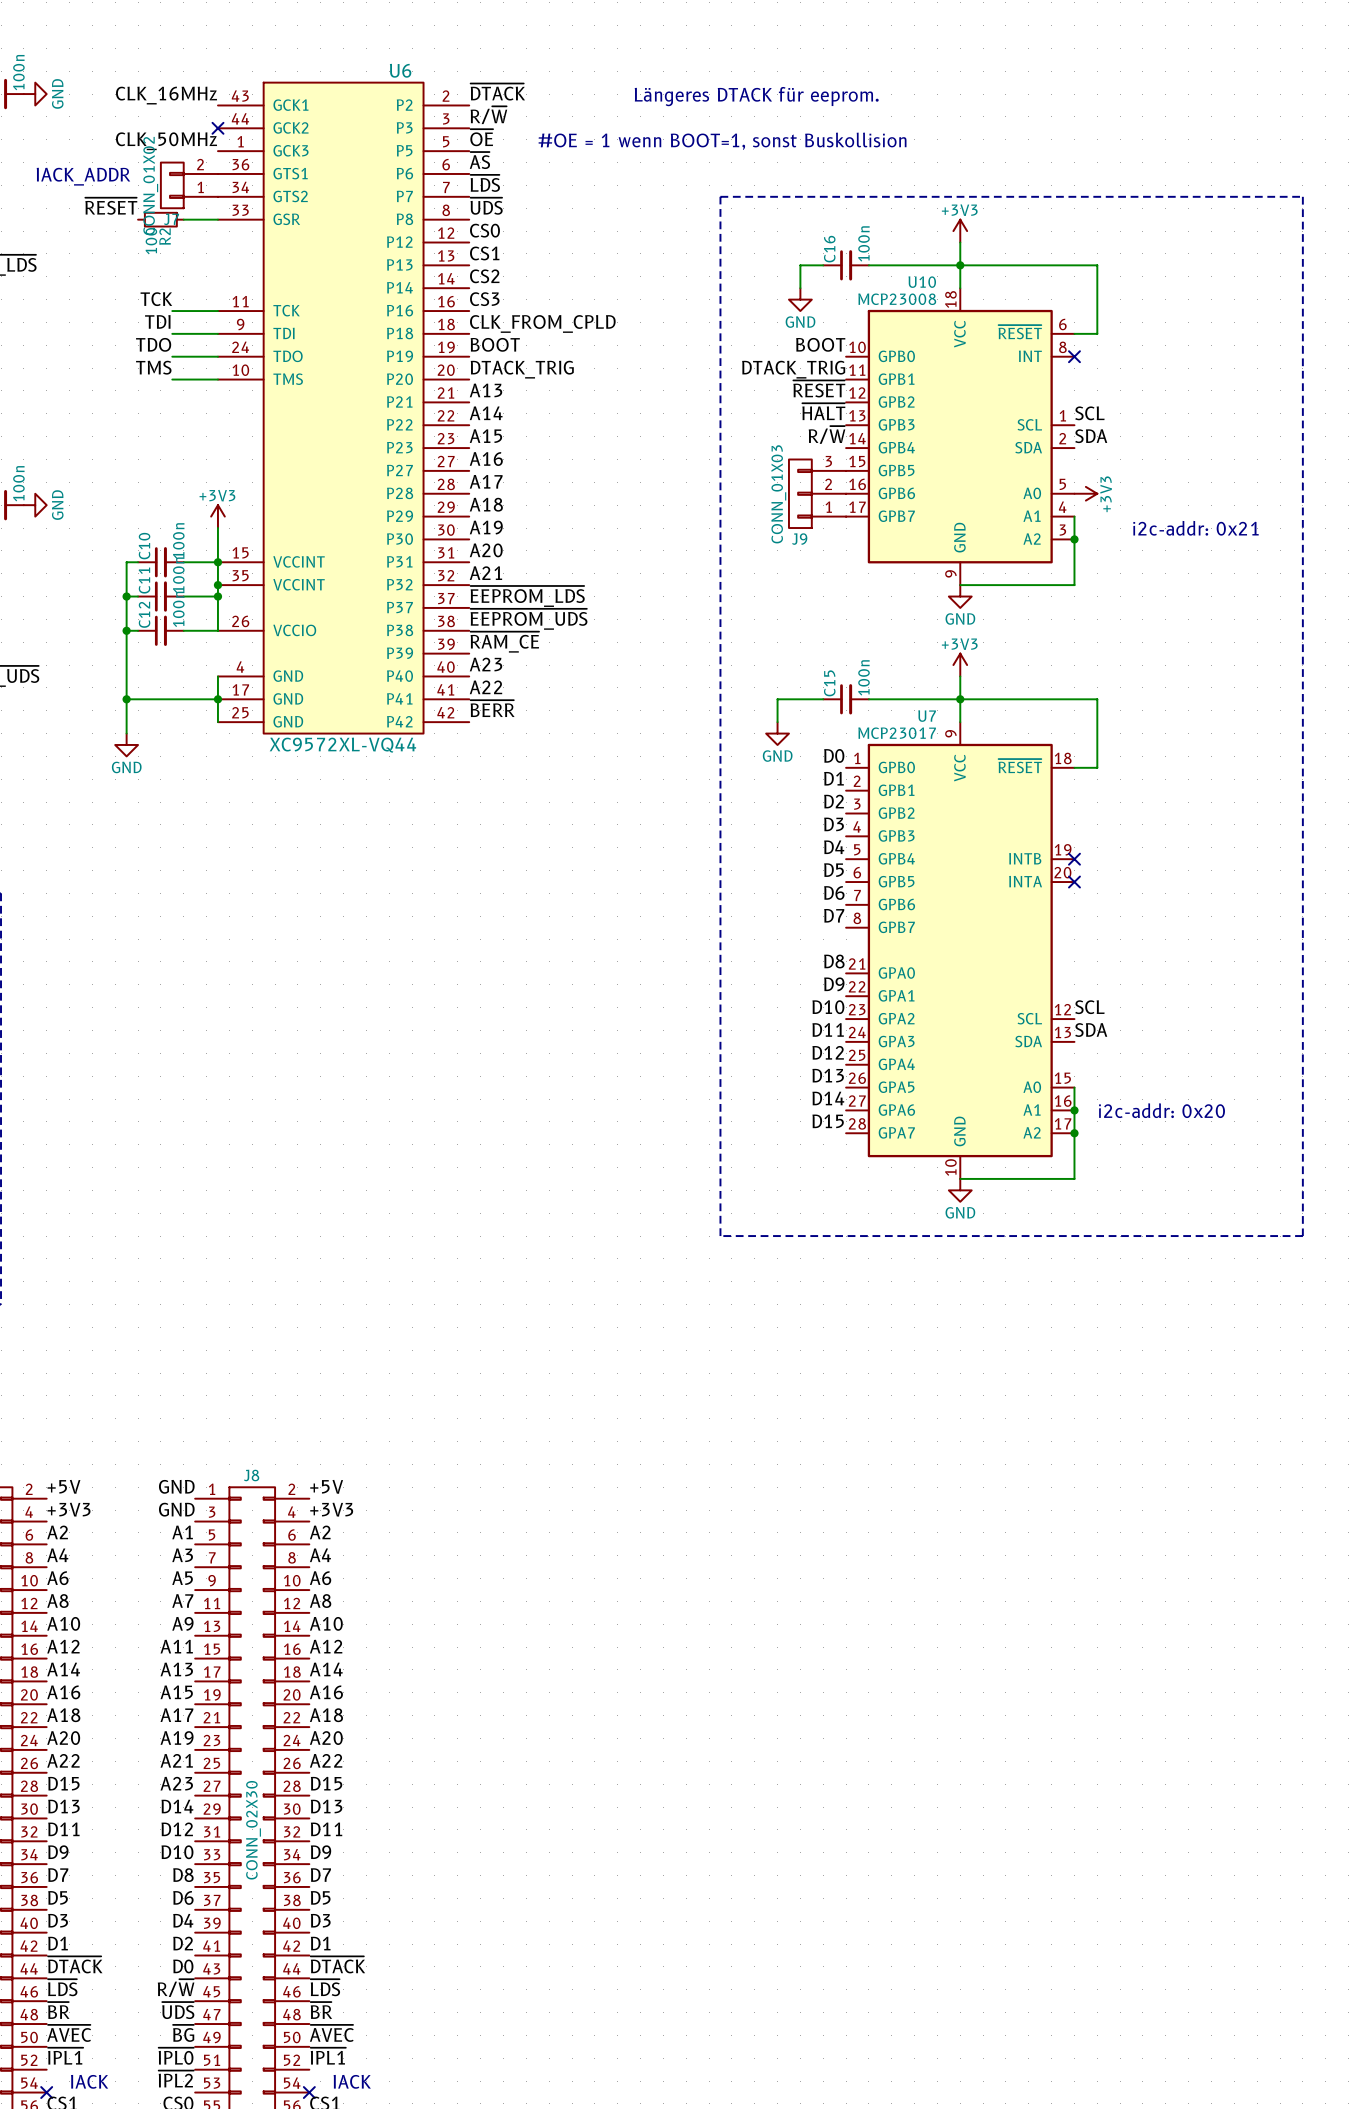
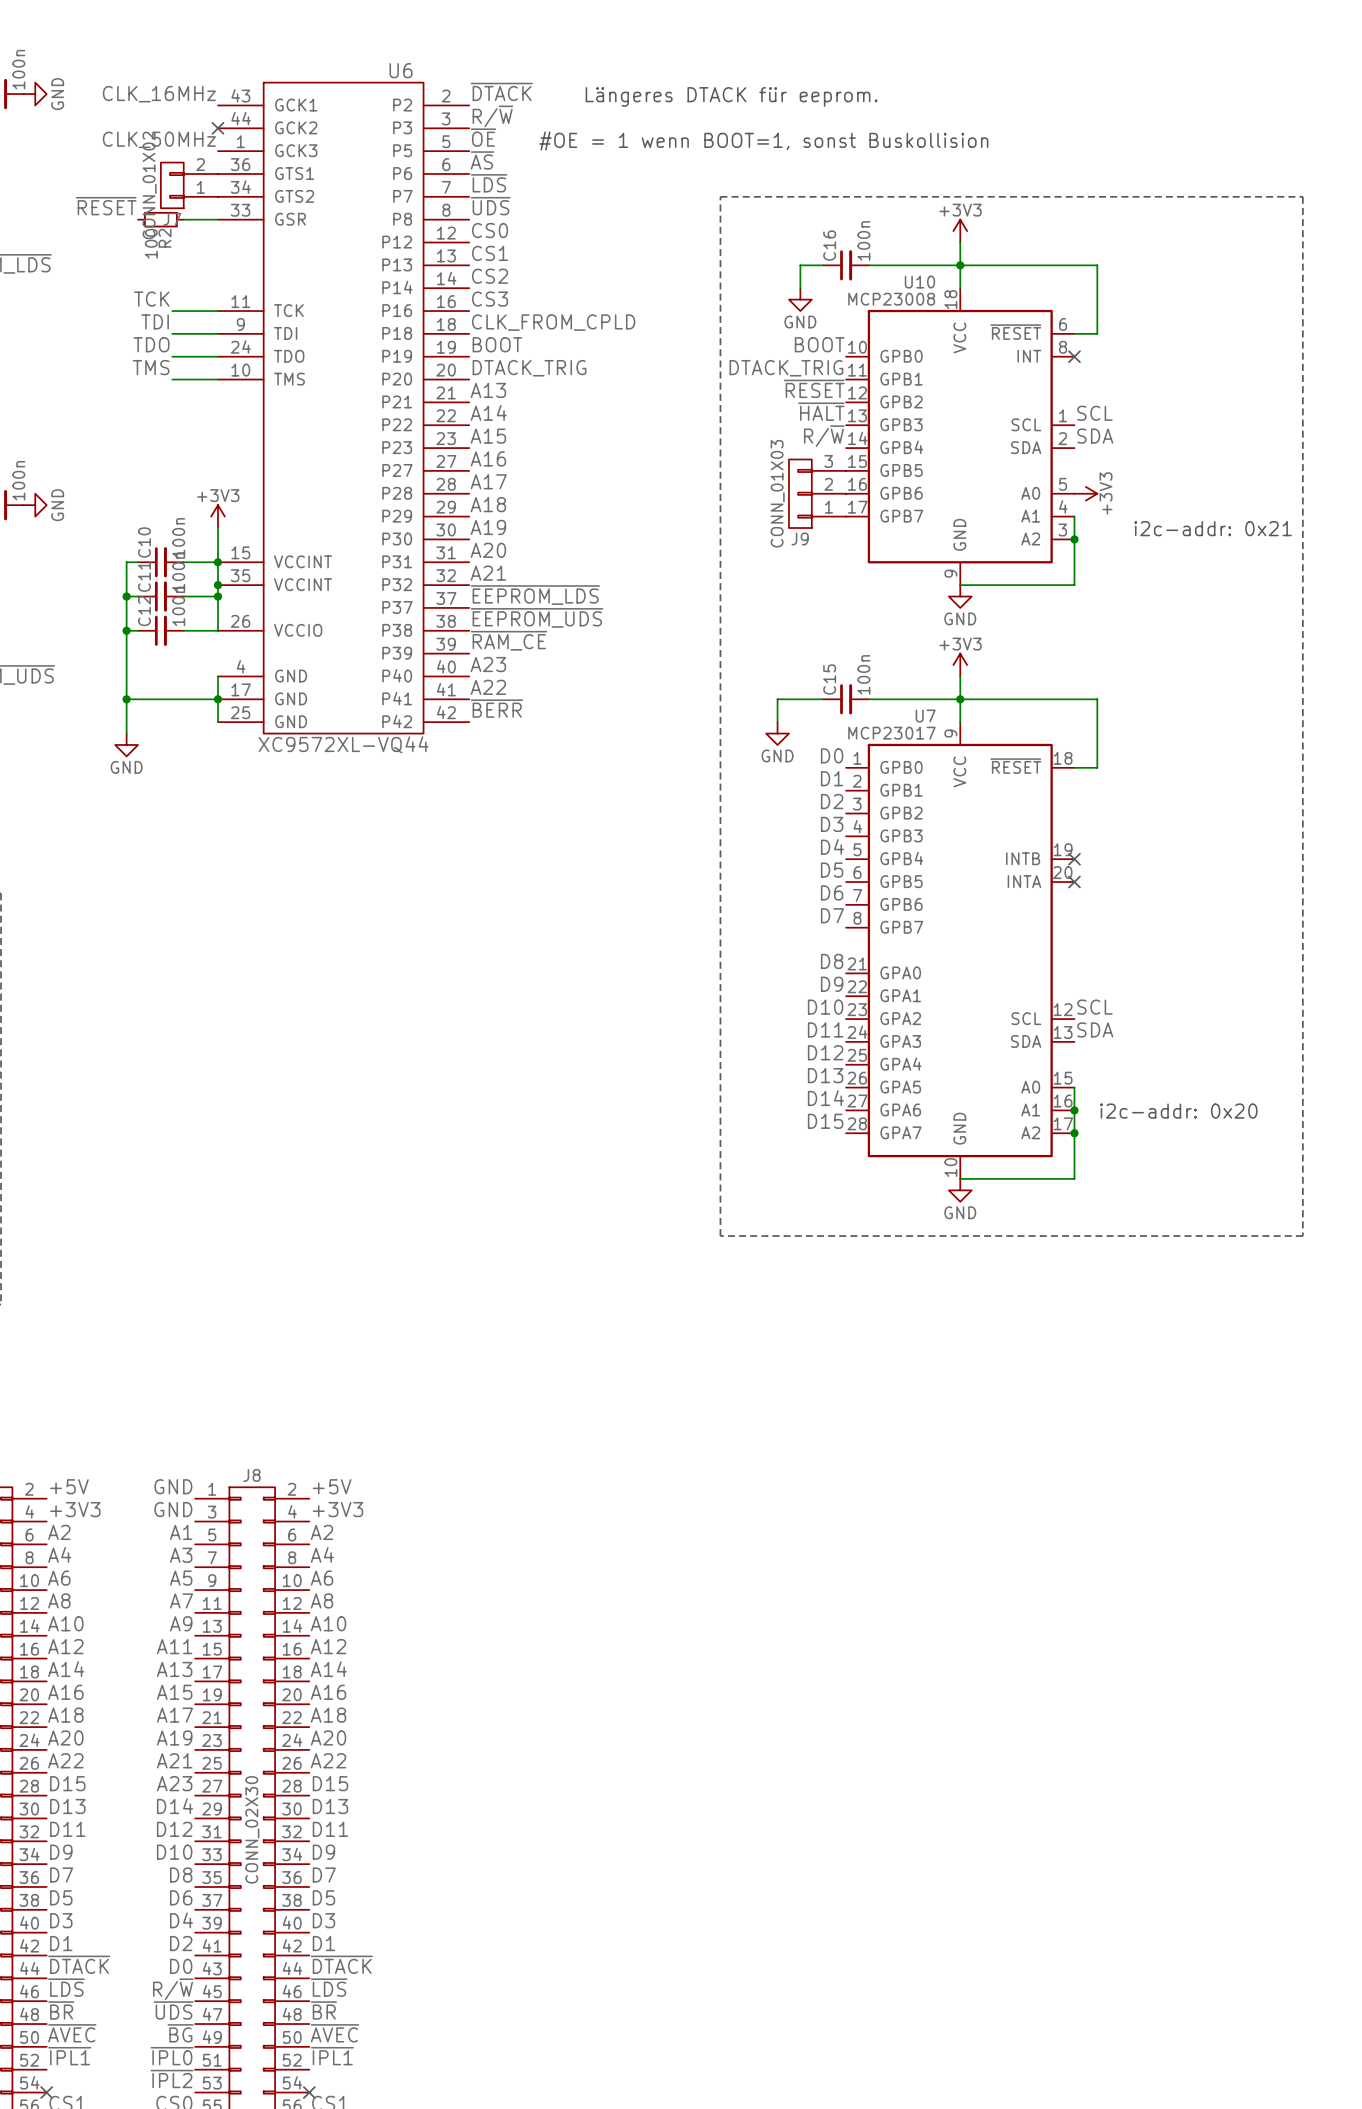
text: IACK_ADDR (83, 176) -> none
text: IACK (89, 2081) -> none
text: IACK (352, 2081) -> none

